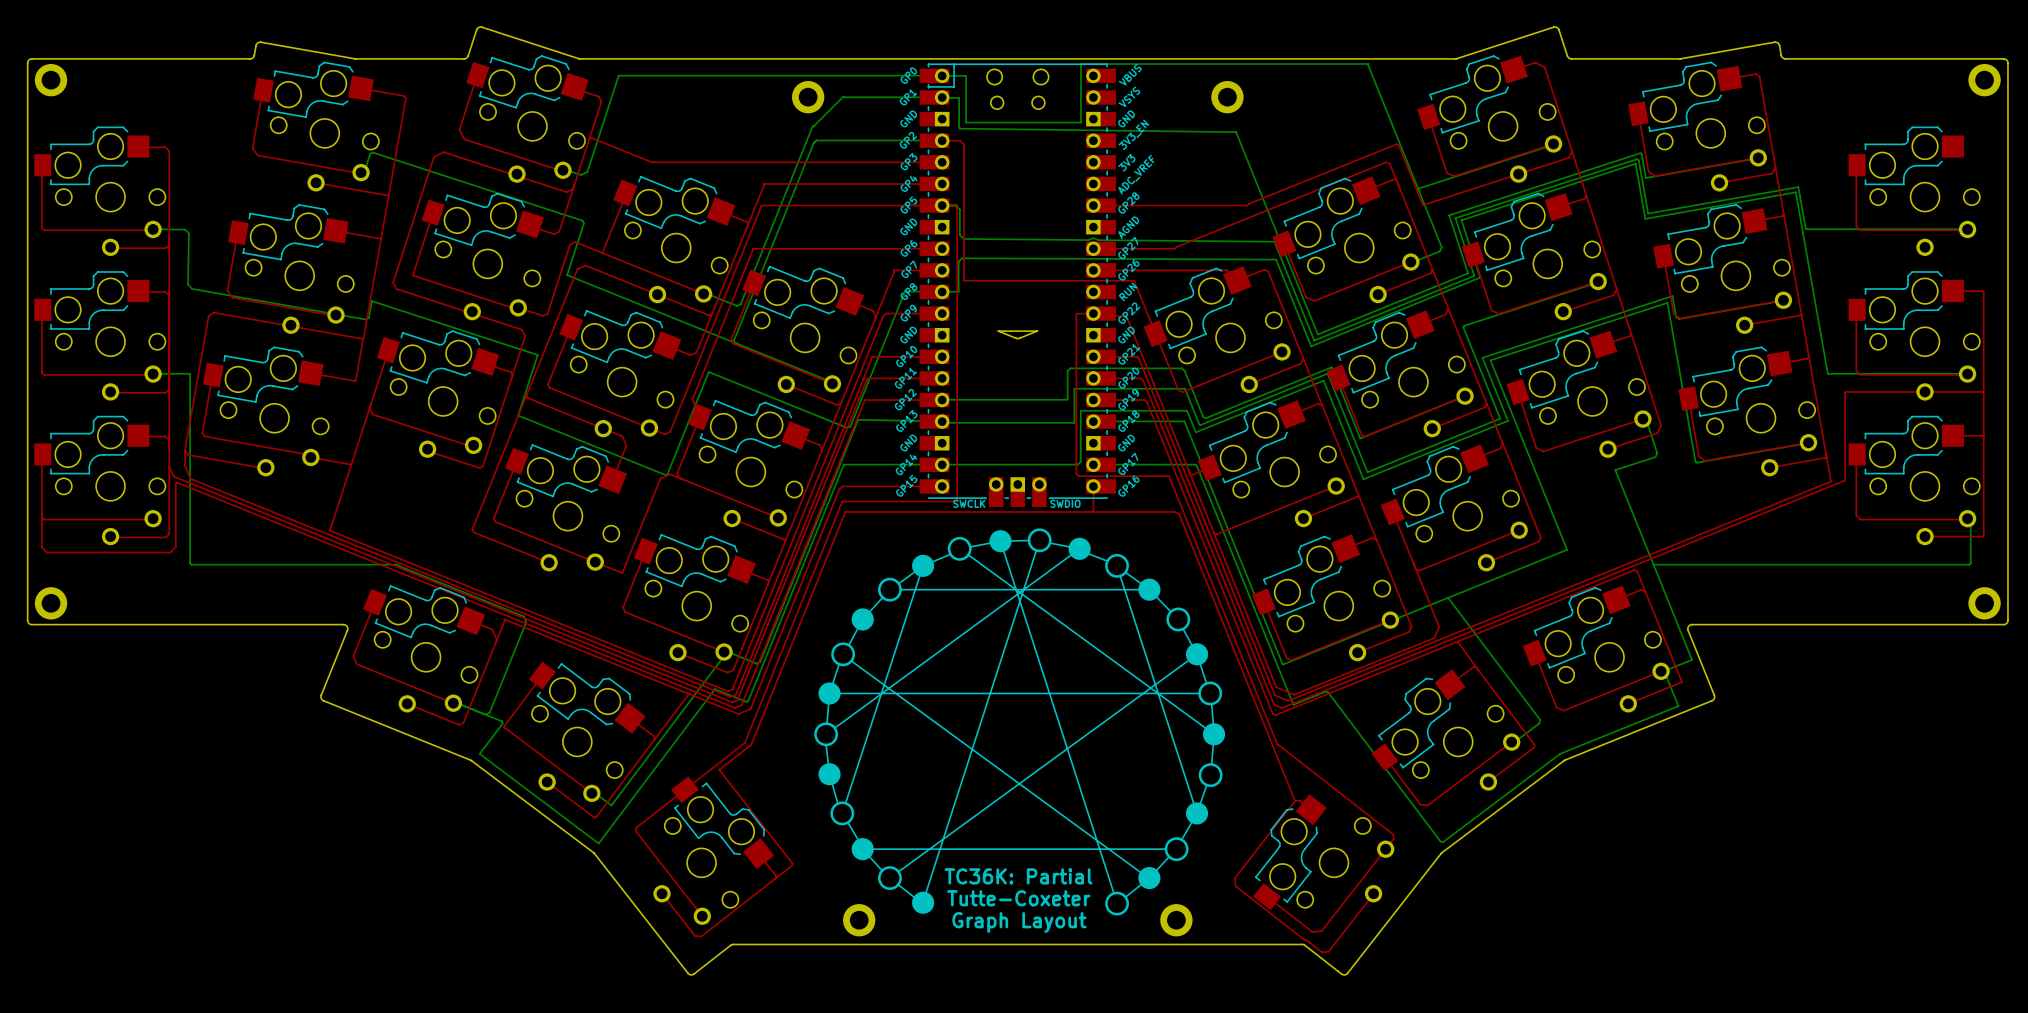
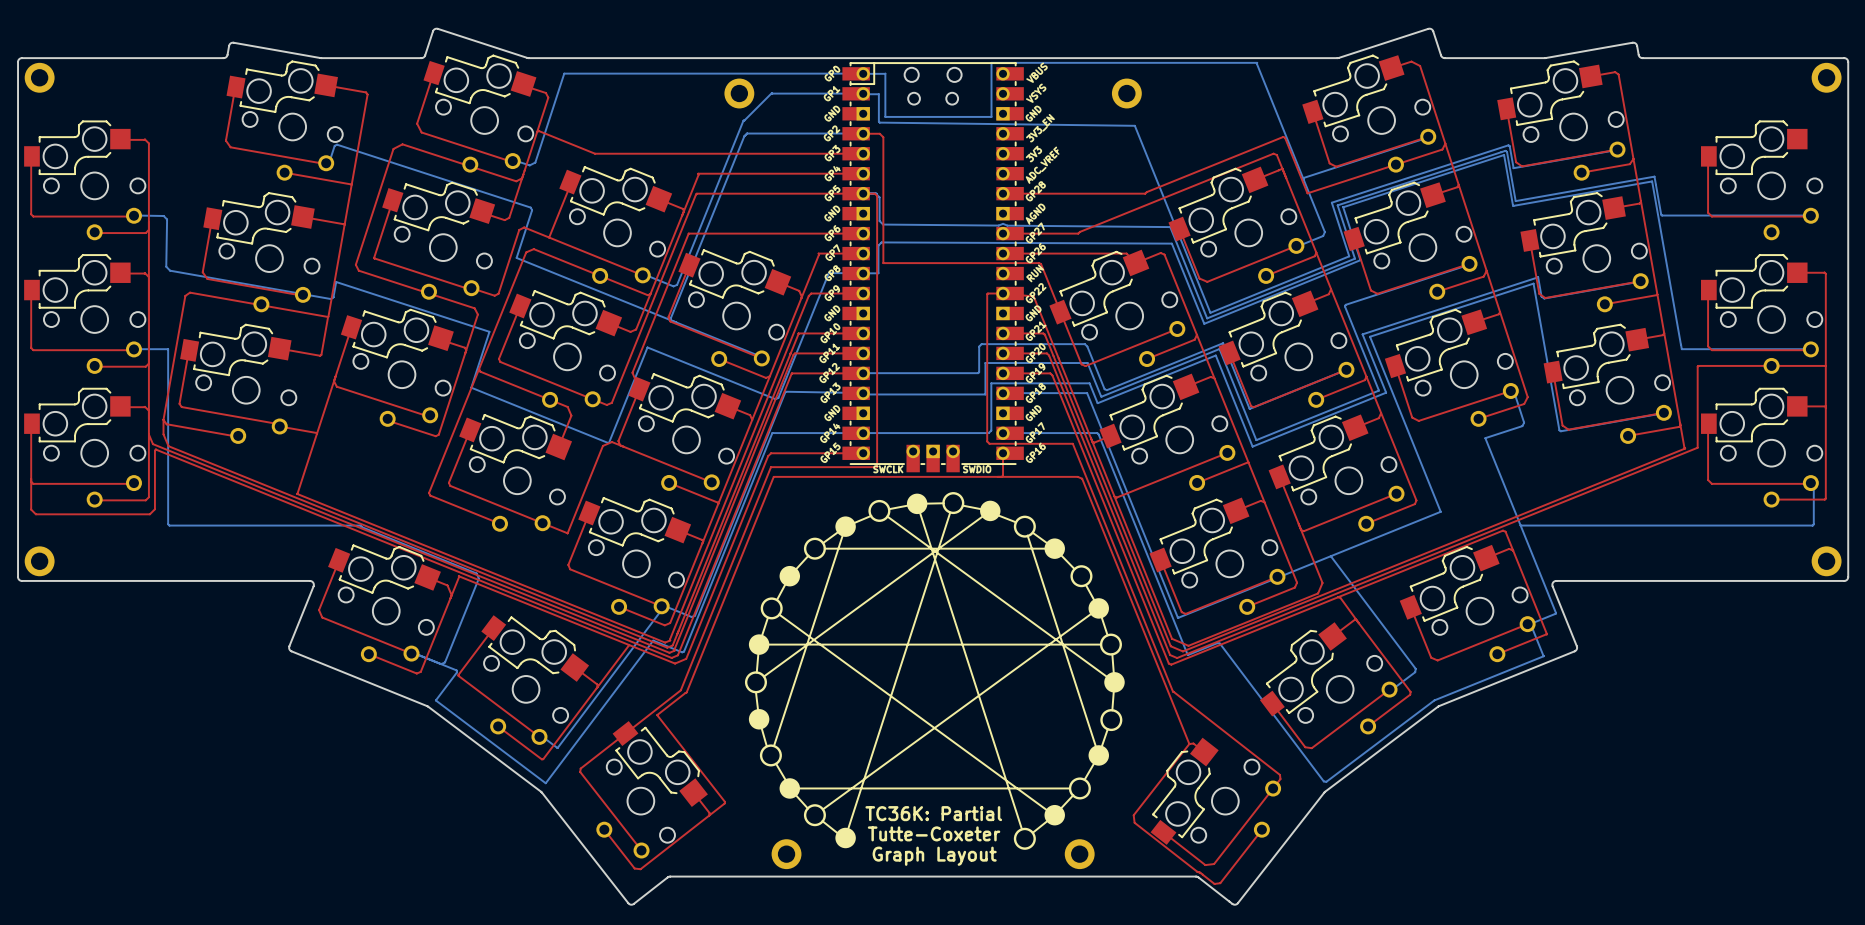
board edge: (998, 331) (1017, 338) (1037, 331) (998, 331) -> none

